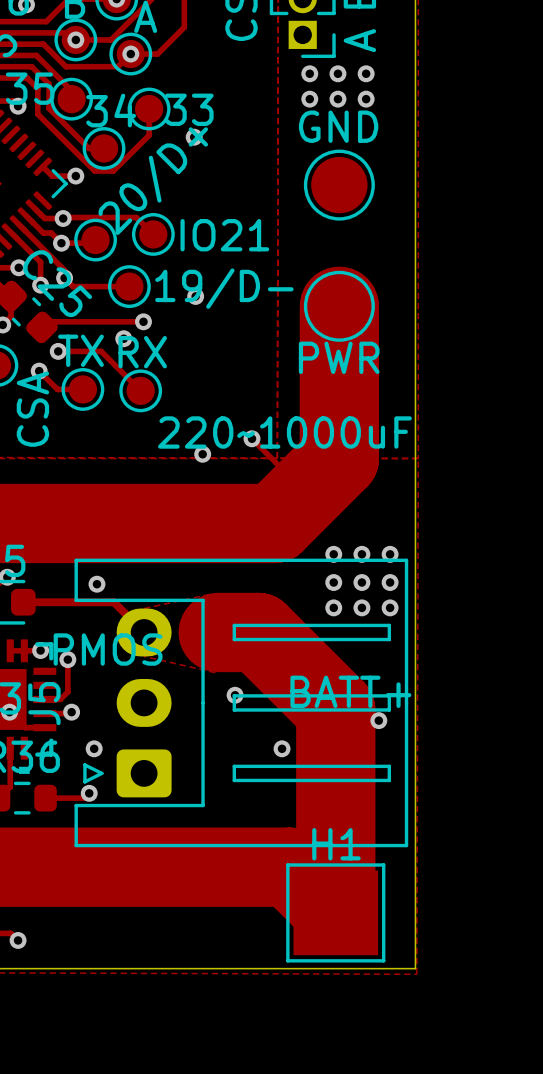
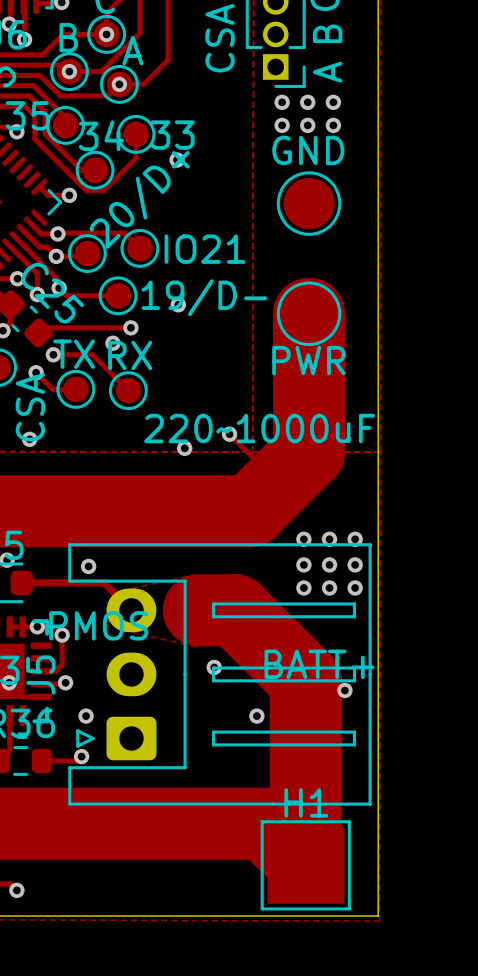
via: none -> (29, 439)

